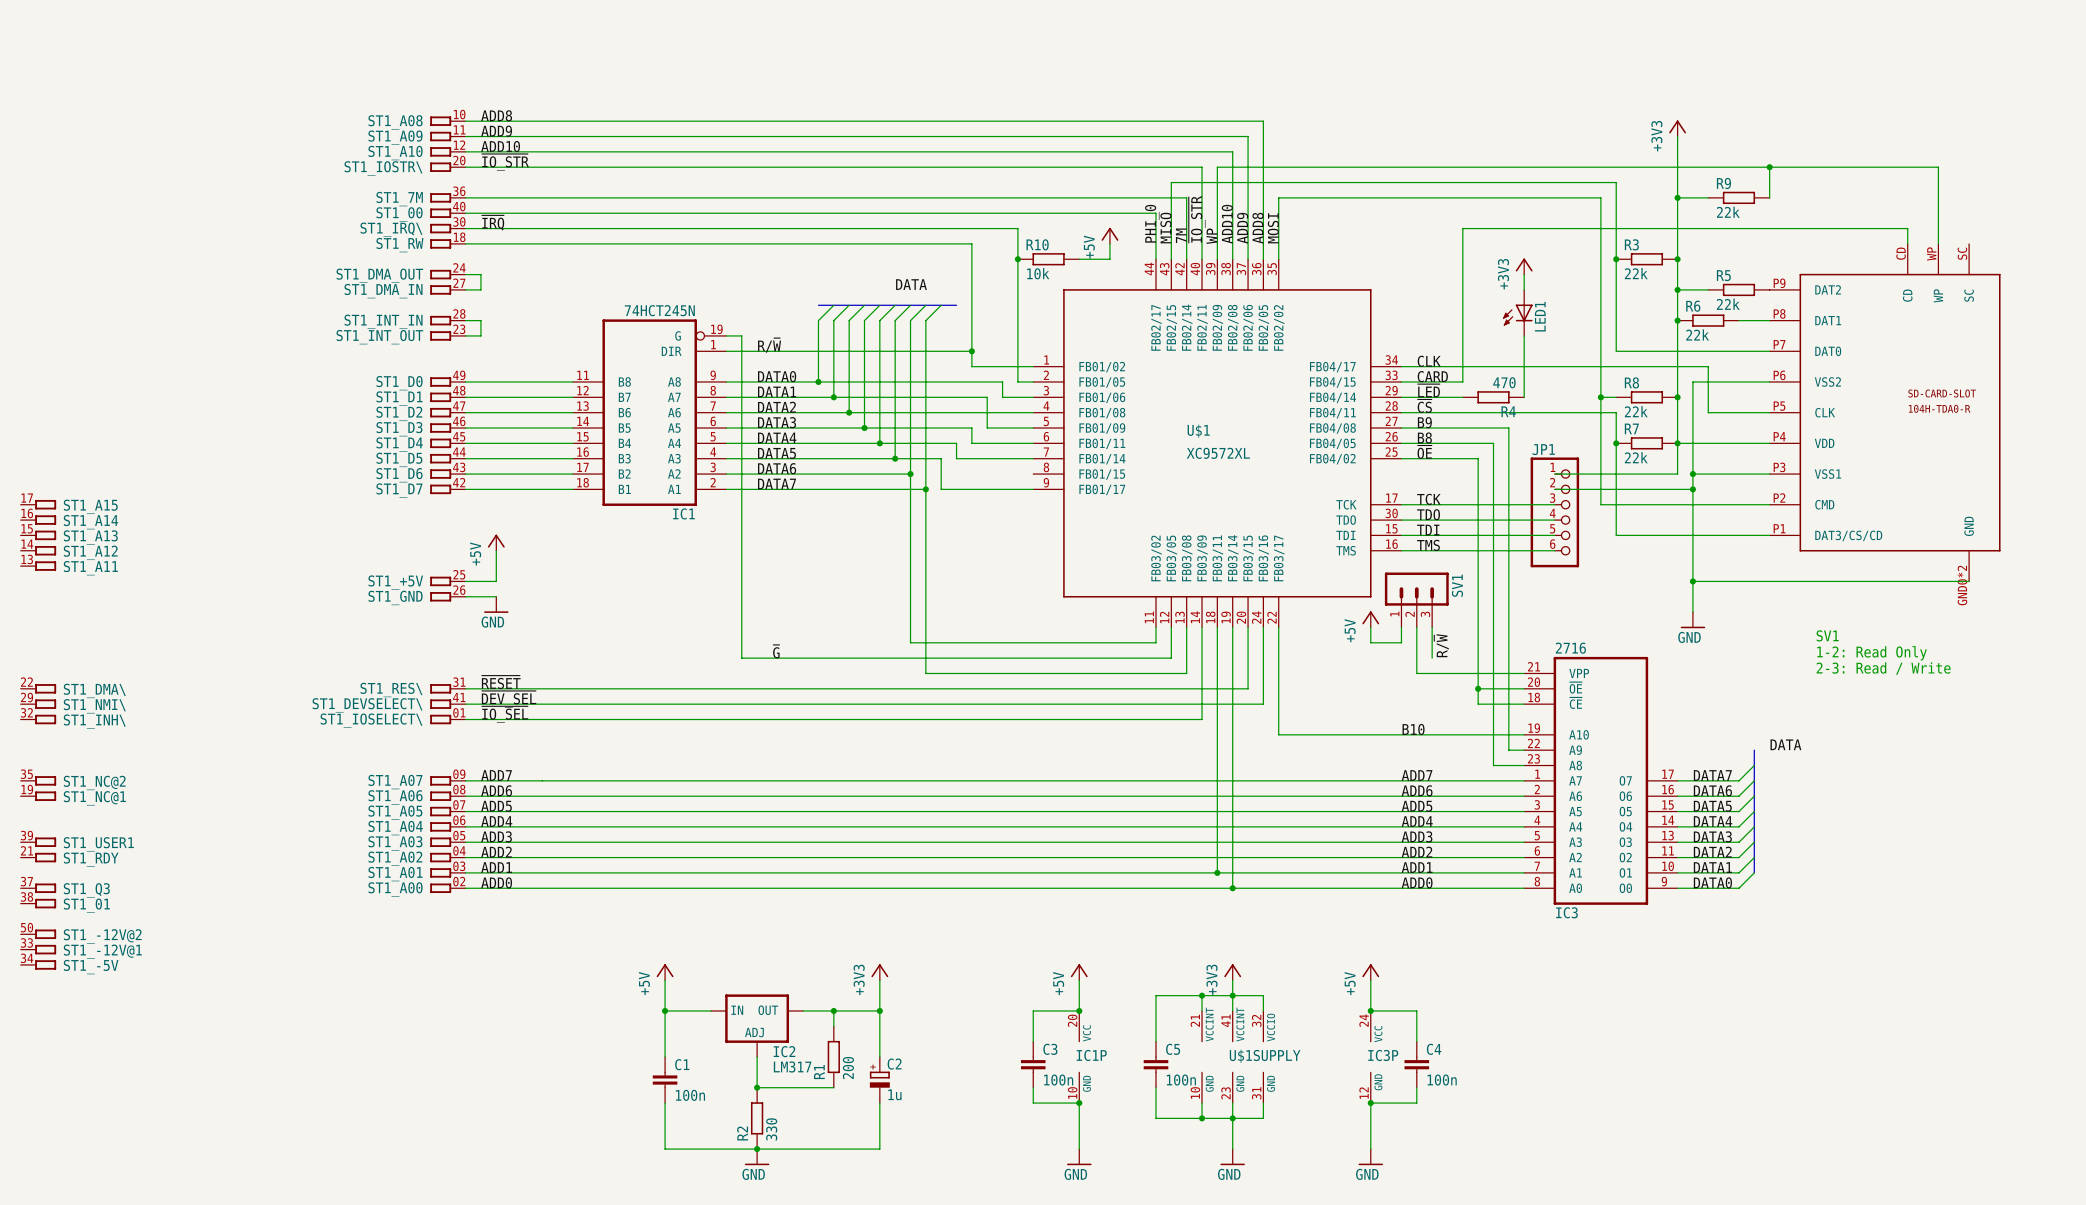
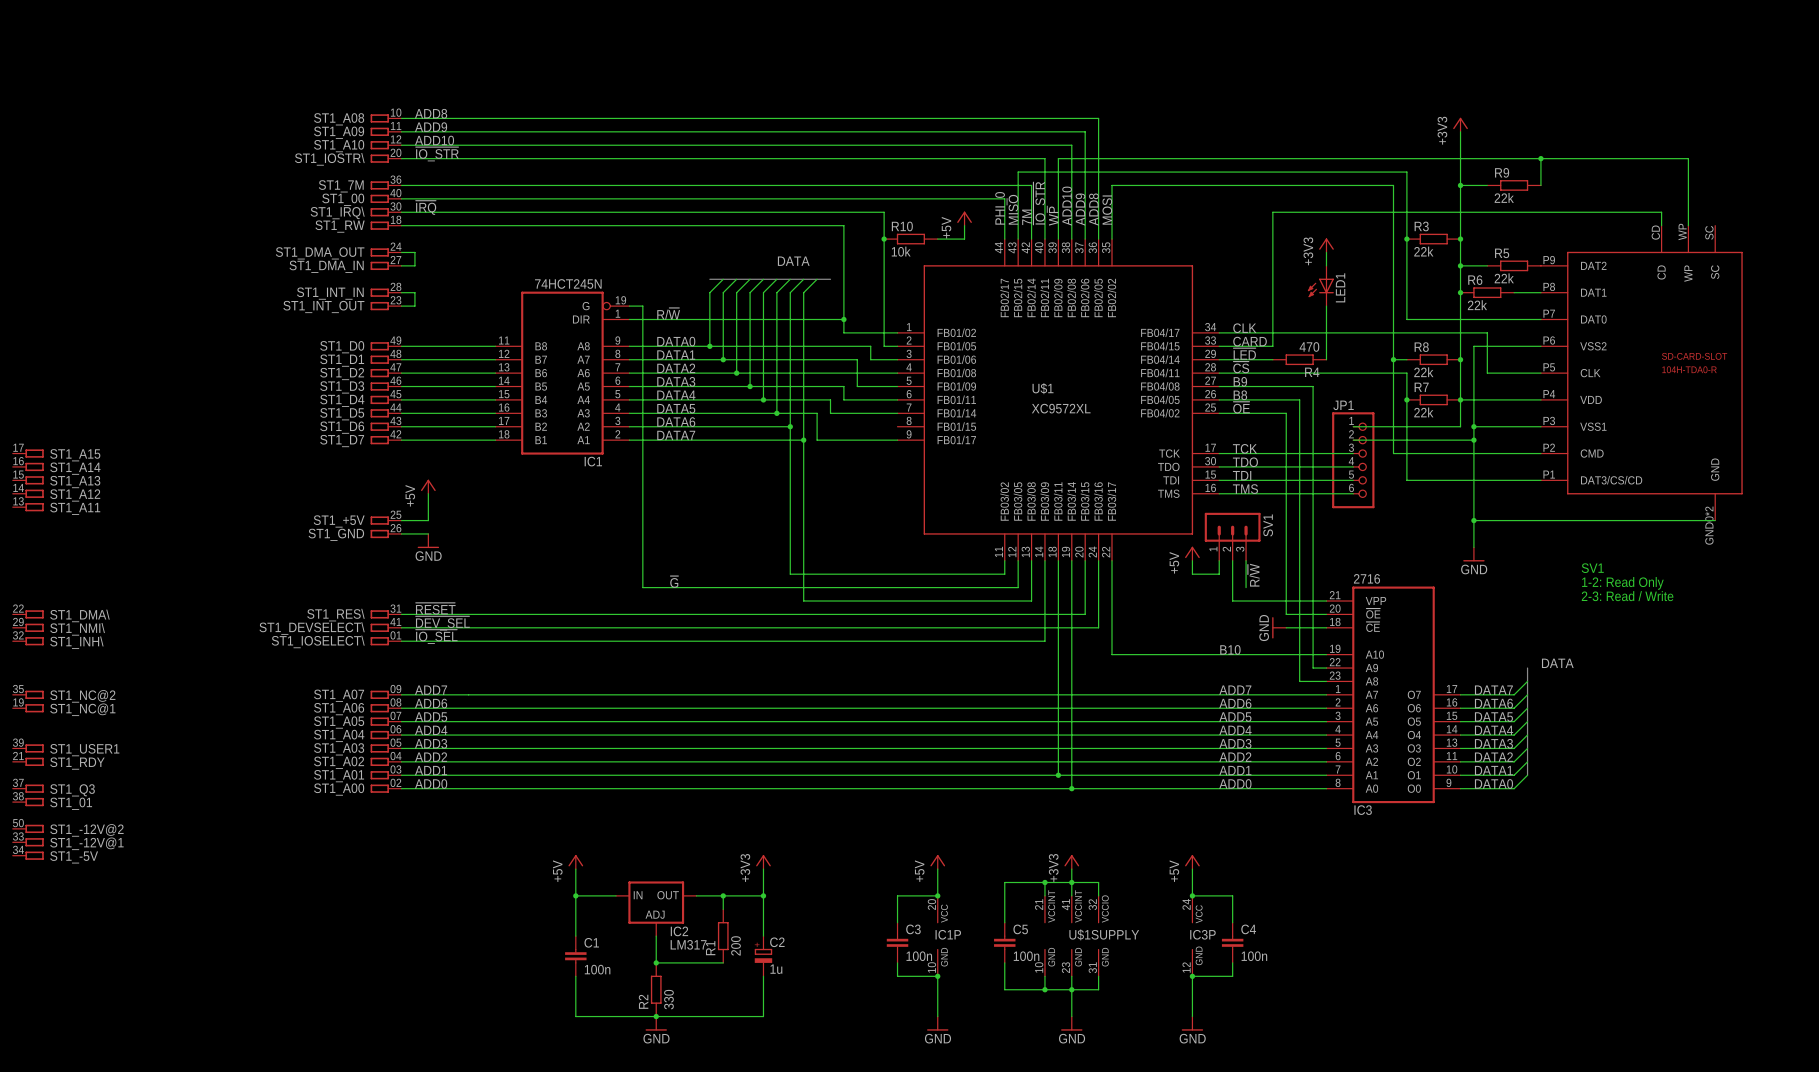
wire: (1478, 688) (1478, 704) -> none
junction: (1478, 688) -> none
power symbol: none -> GND (1279, 627)

